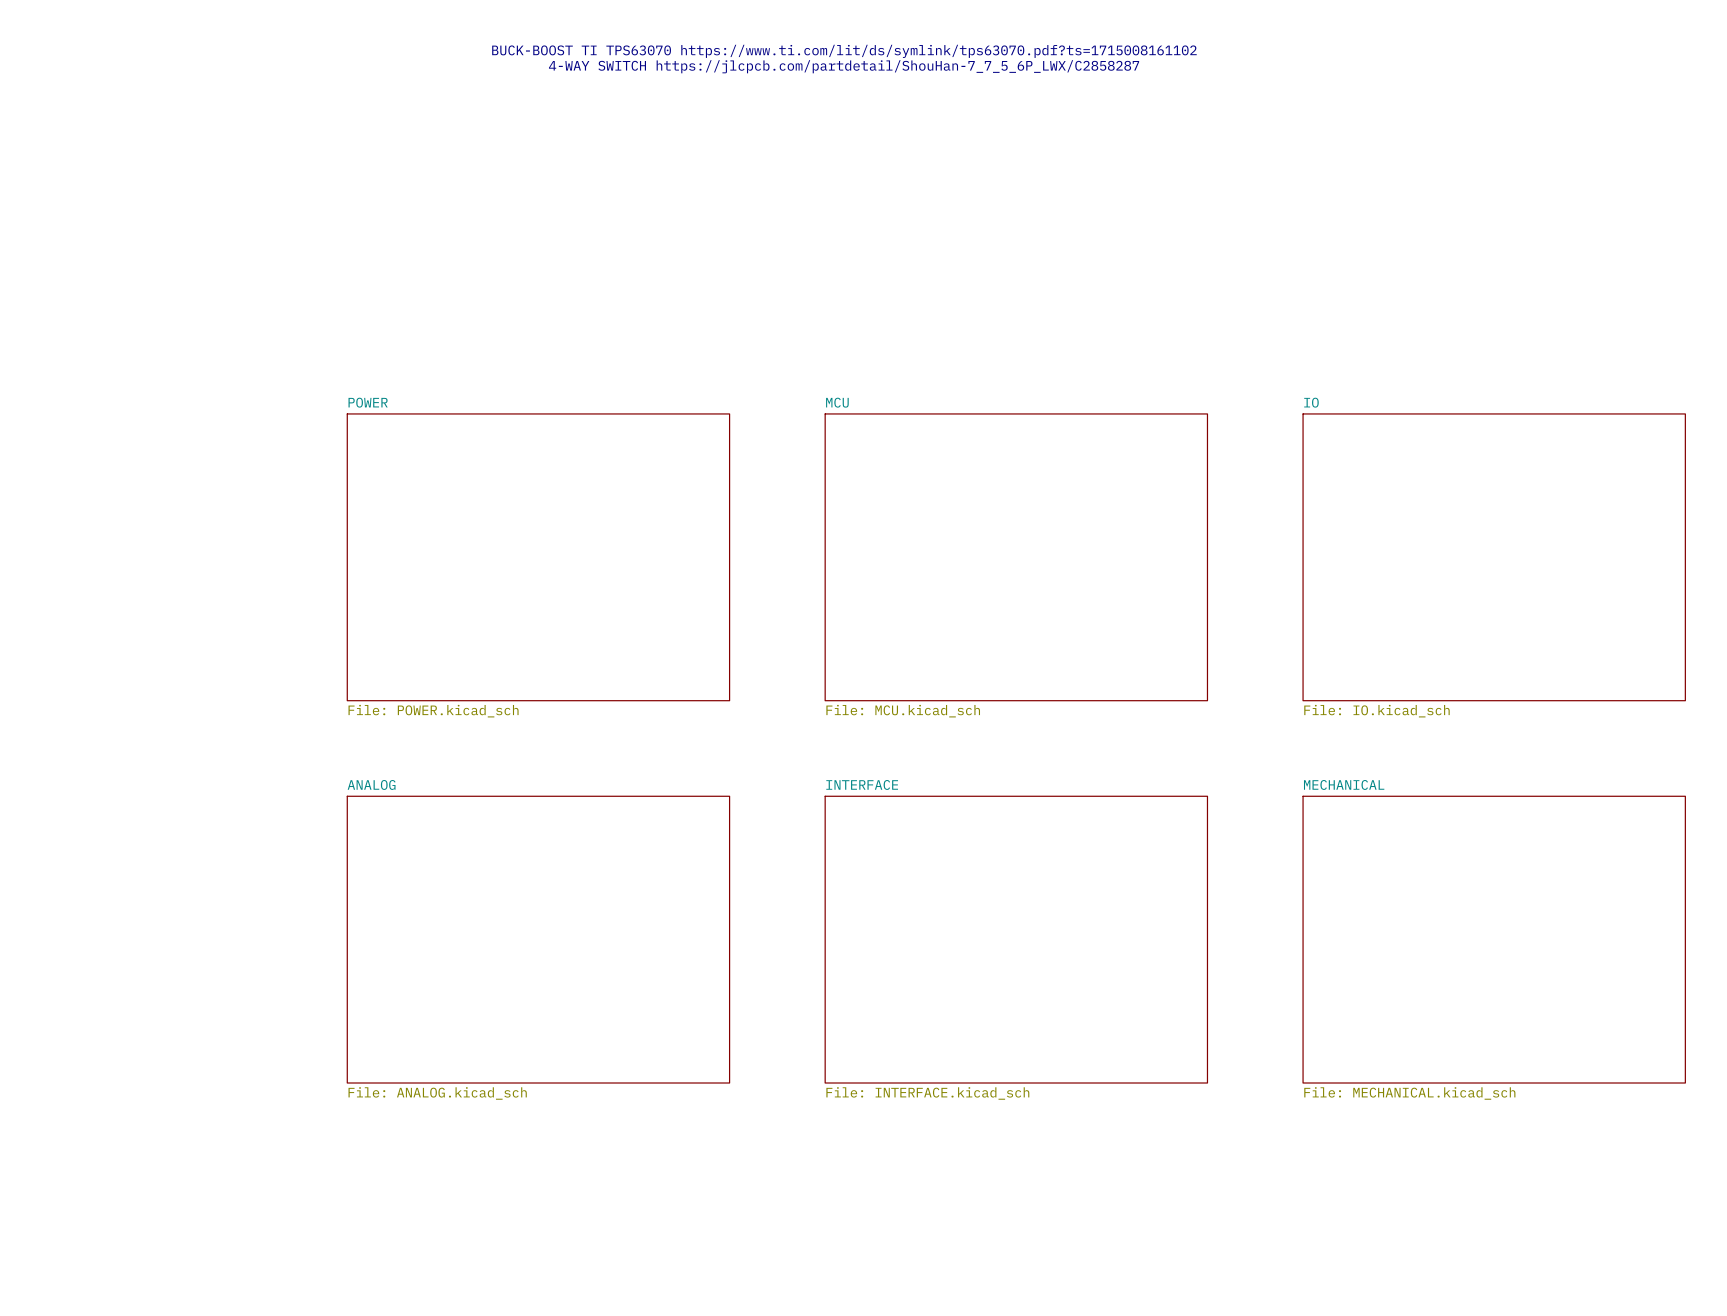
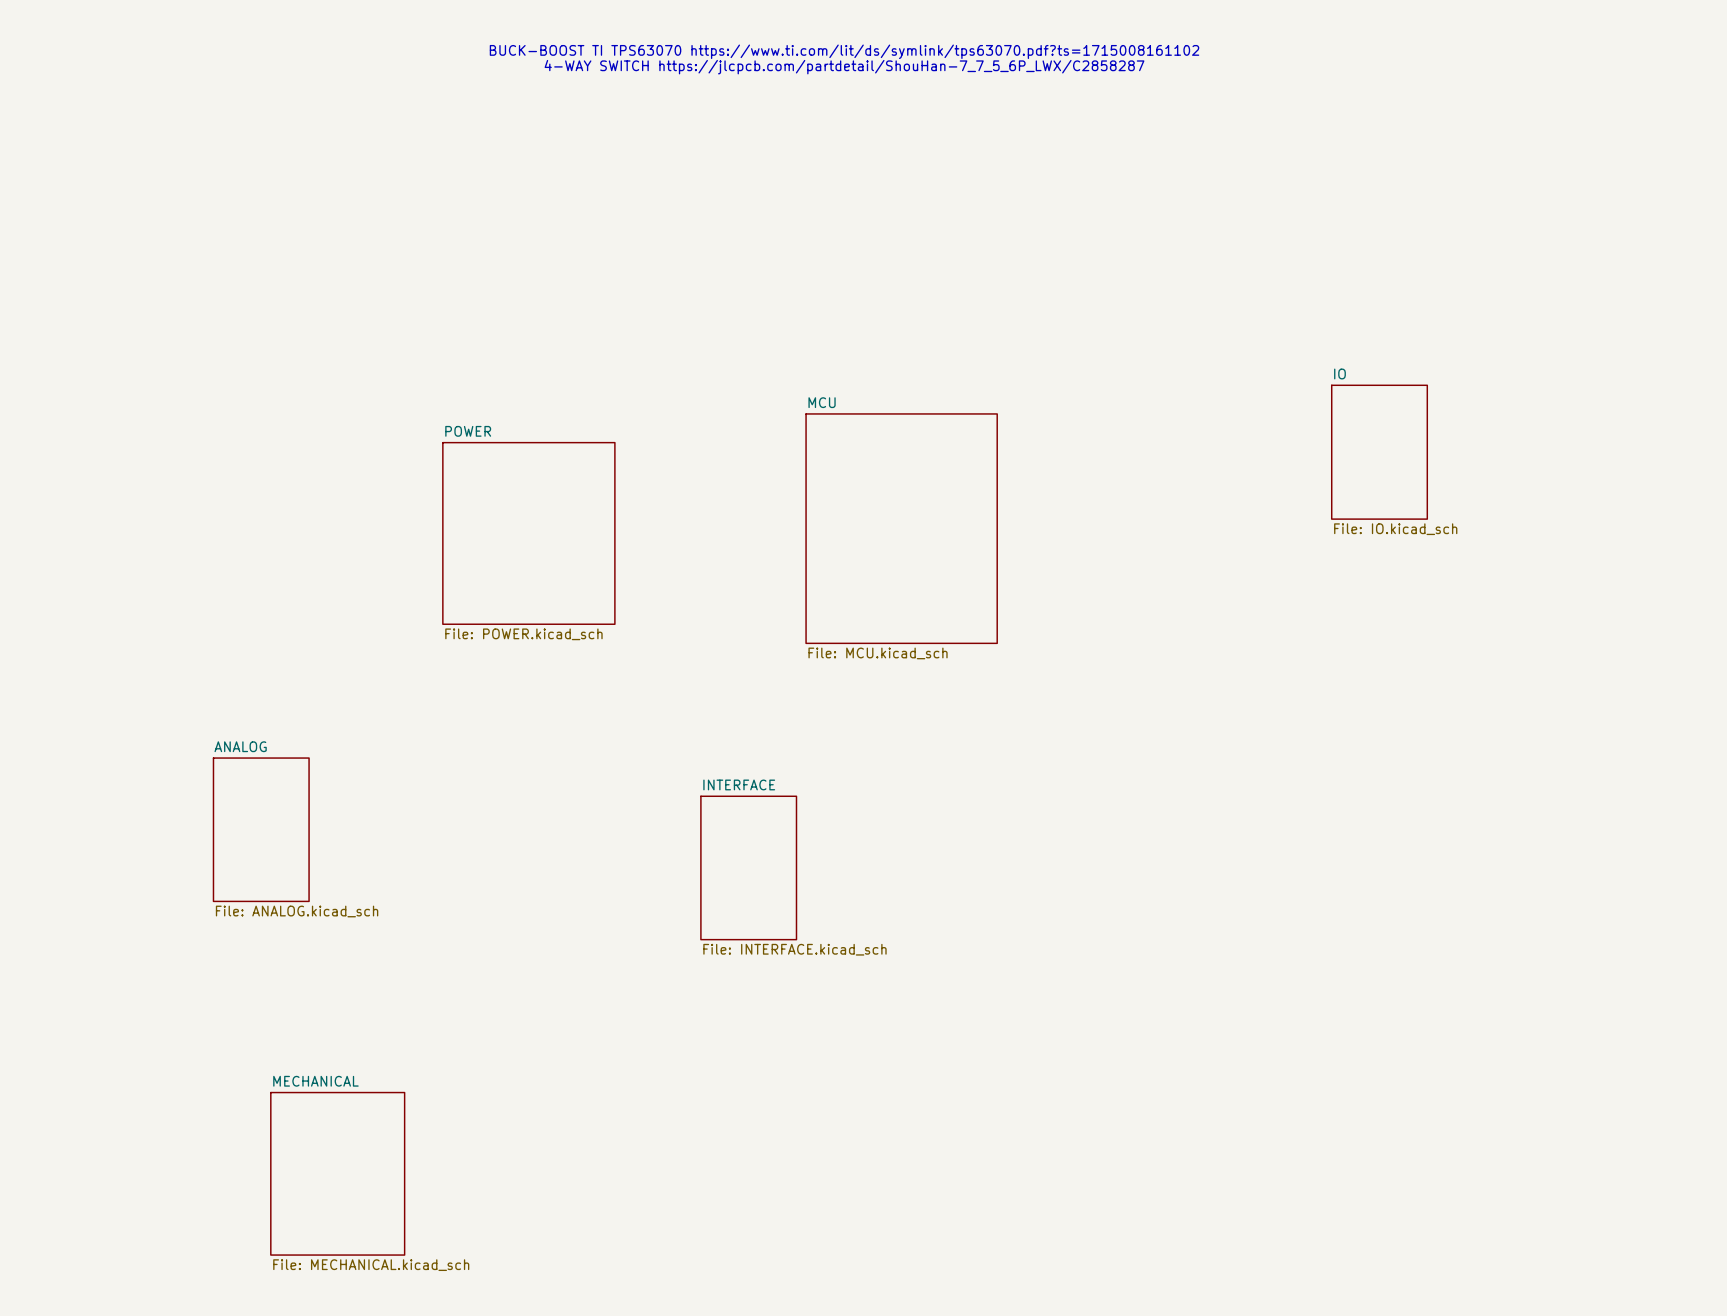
sheet IO: none -> File: IO.kicad_sch (1379, 452)
sheet MCU: none -> File: MCU.kicad_sch (901, 528)
sheet POWER: none -> File: POWER.kicad_sch (528, 533)
sheet POWER: File: POWER.kicad_sch (538, 557) -> none
sheet MCU: File: MCU.kicad_sch (1016, 557) -> none
sheet IO: File: IO.kicad_sch (1494, 557) -> none
sheet ANALOG: none -> File: ANALOG.kicad_sch (261, 829)
sheet INTERFACE: none -> File: INTERFACE.kicad_sch (748, 867)
sheet ANALOG: File: ANALOG.kicad_sch (538, 939) -> none
sheet INTERFACE: File: INTERFACE.kicad_sch (1016, 939) -> none
sheet MECHANICAL: File: MECHANICAL.kicad_sch (1494, 939) -> none
sheet MECHANICAL: none -> File: MECHANICAL.kicad_sch (337, 1173)

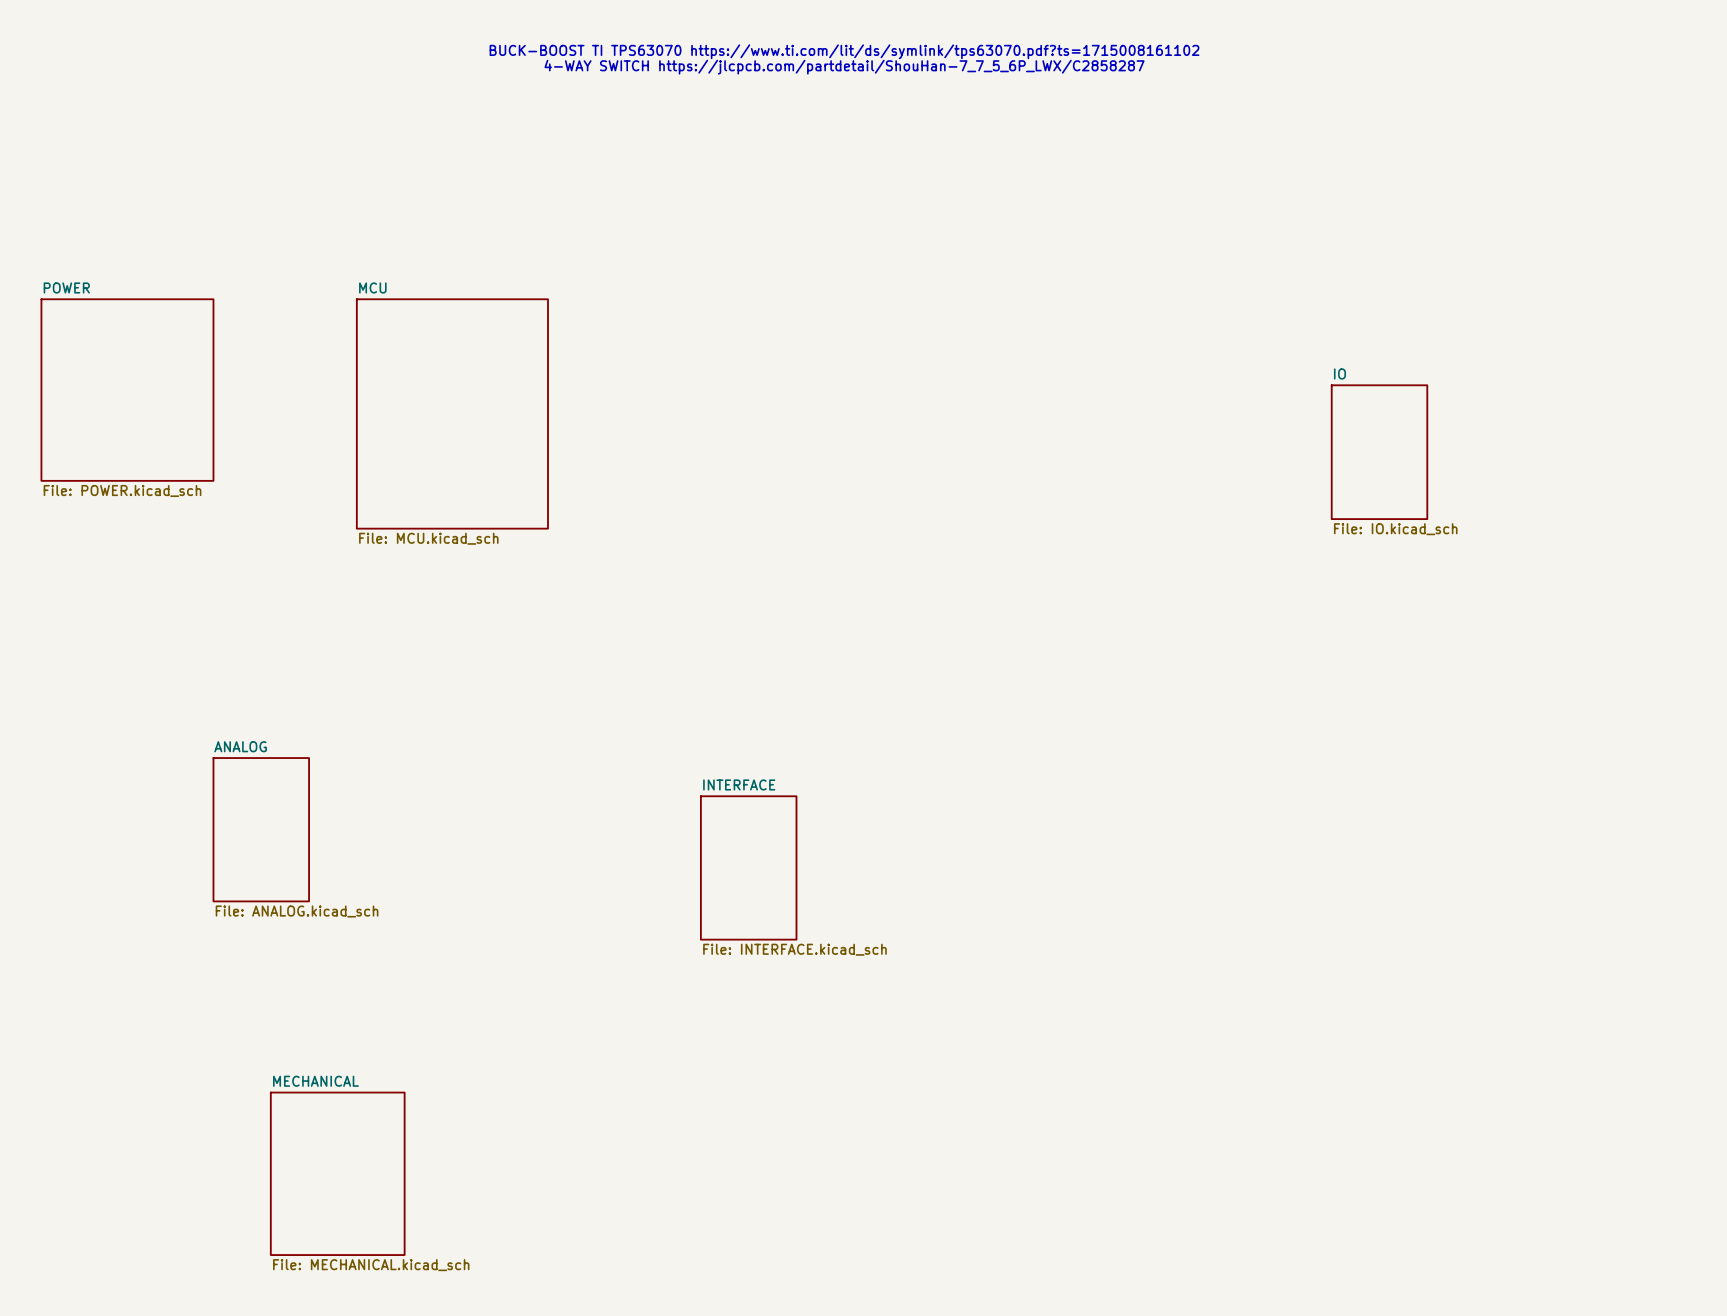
sheet POWER: none -> File: POWER.kicad_sch (127, 390)
sheet MCU: none -> File: MCU.kicad_sch (452, 413)
sheet MCU: File: MCU.kicad_sch (901, 528) -> none
sheet POWER: File: POWER.kicad_sch (528, 533) -> none

